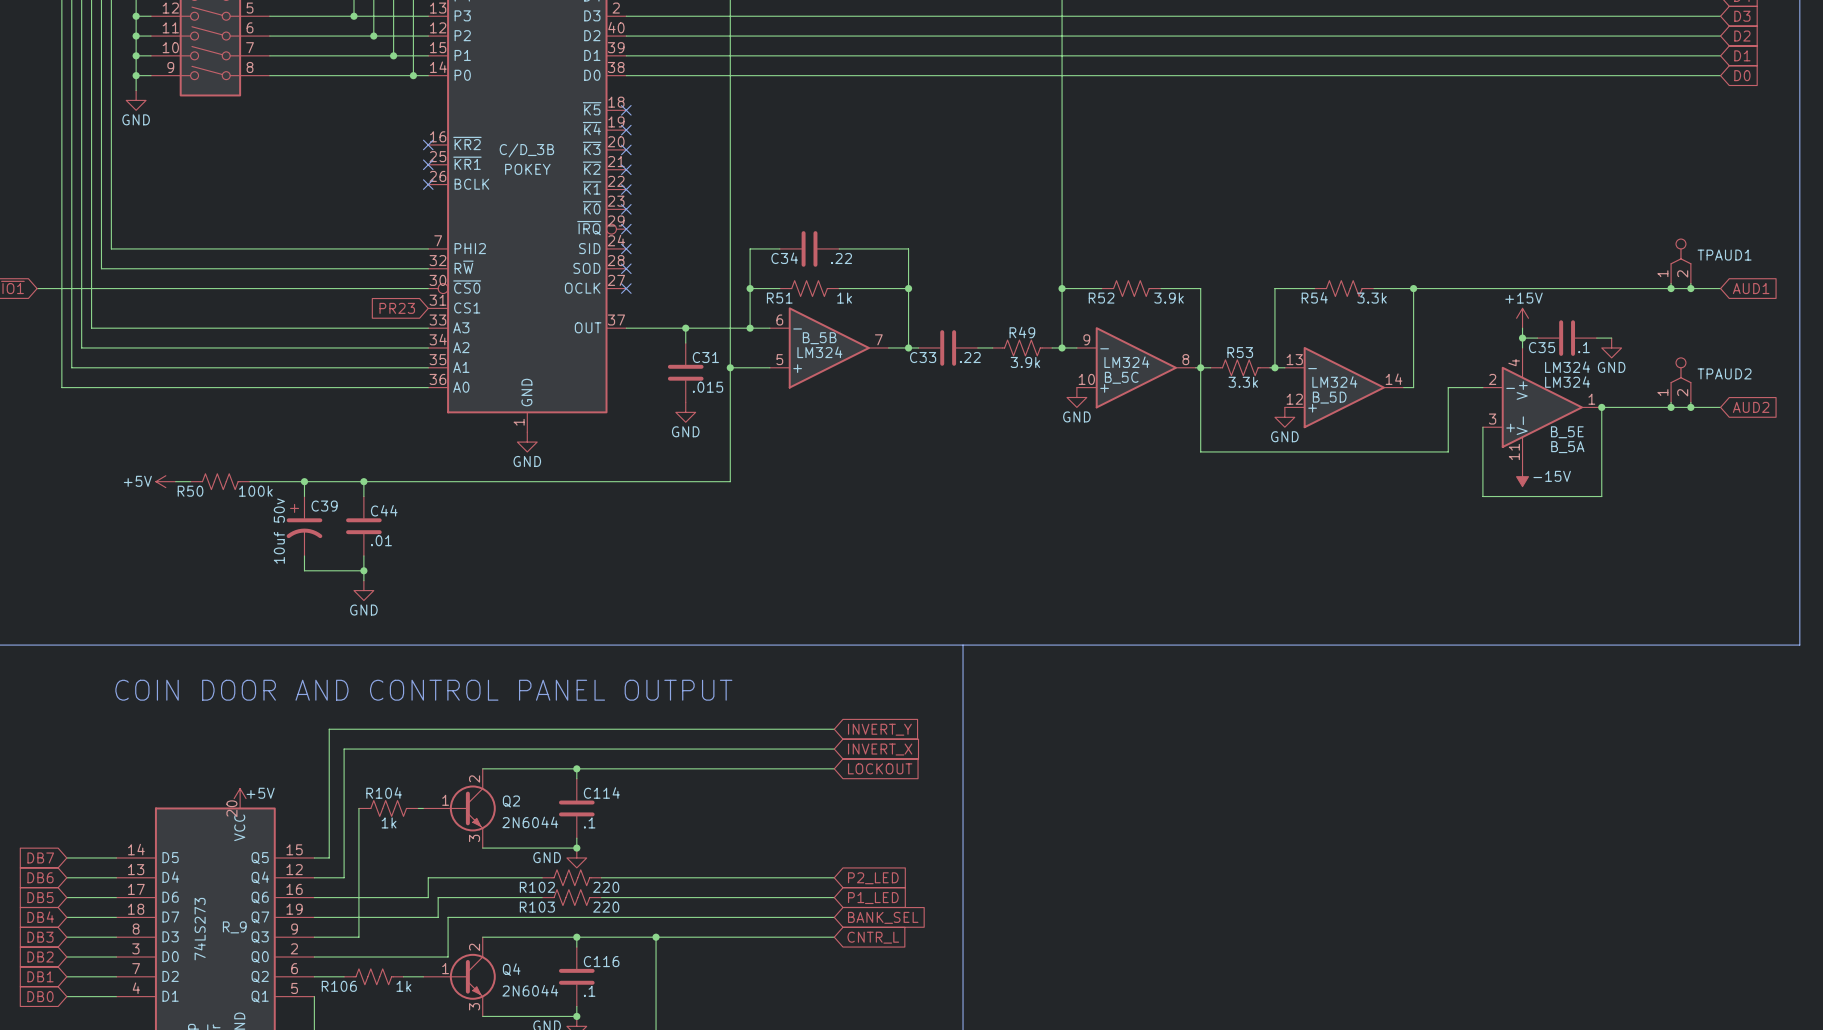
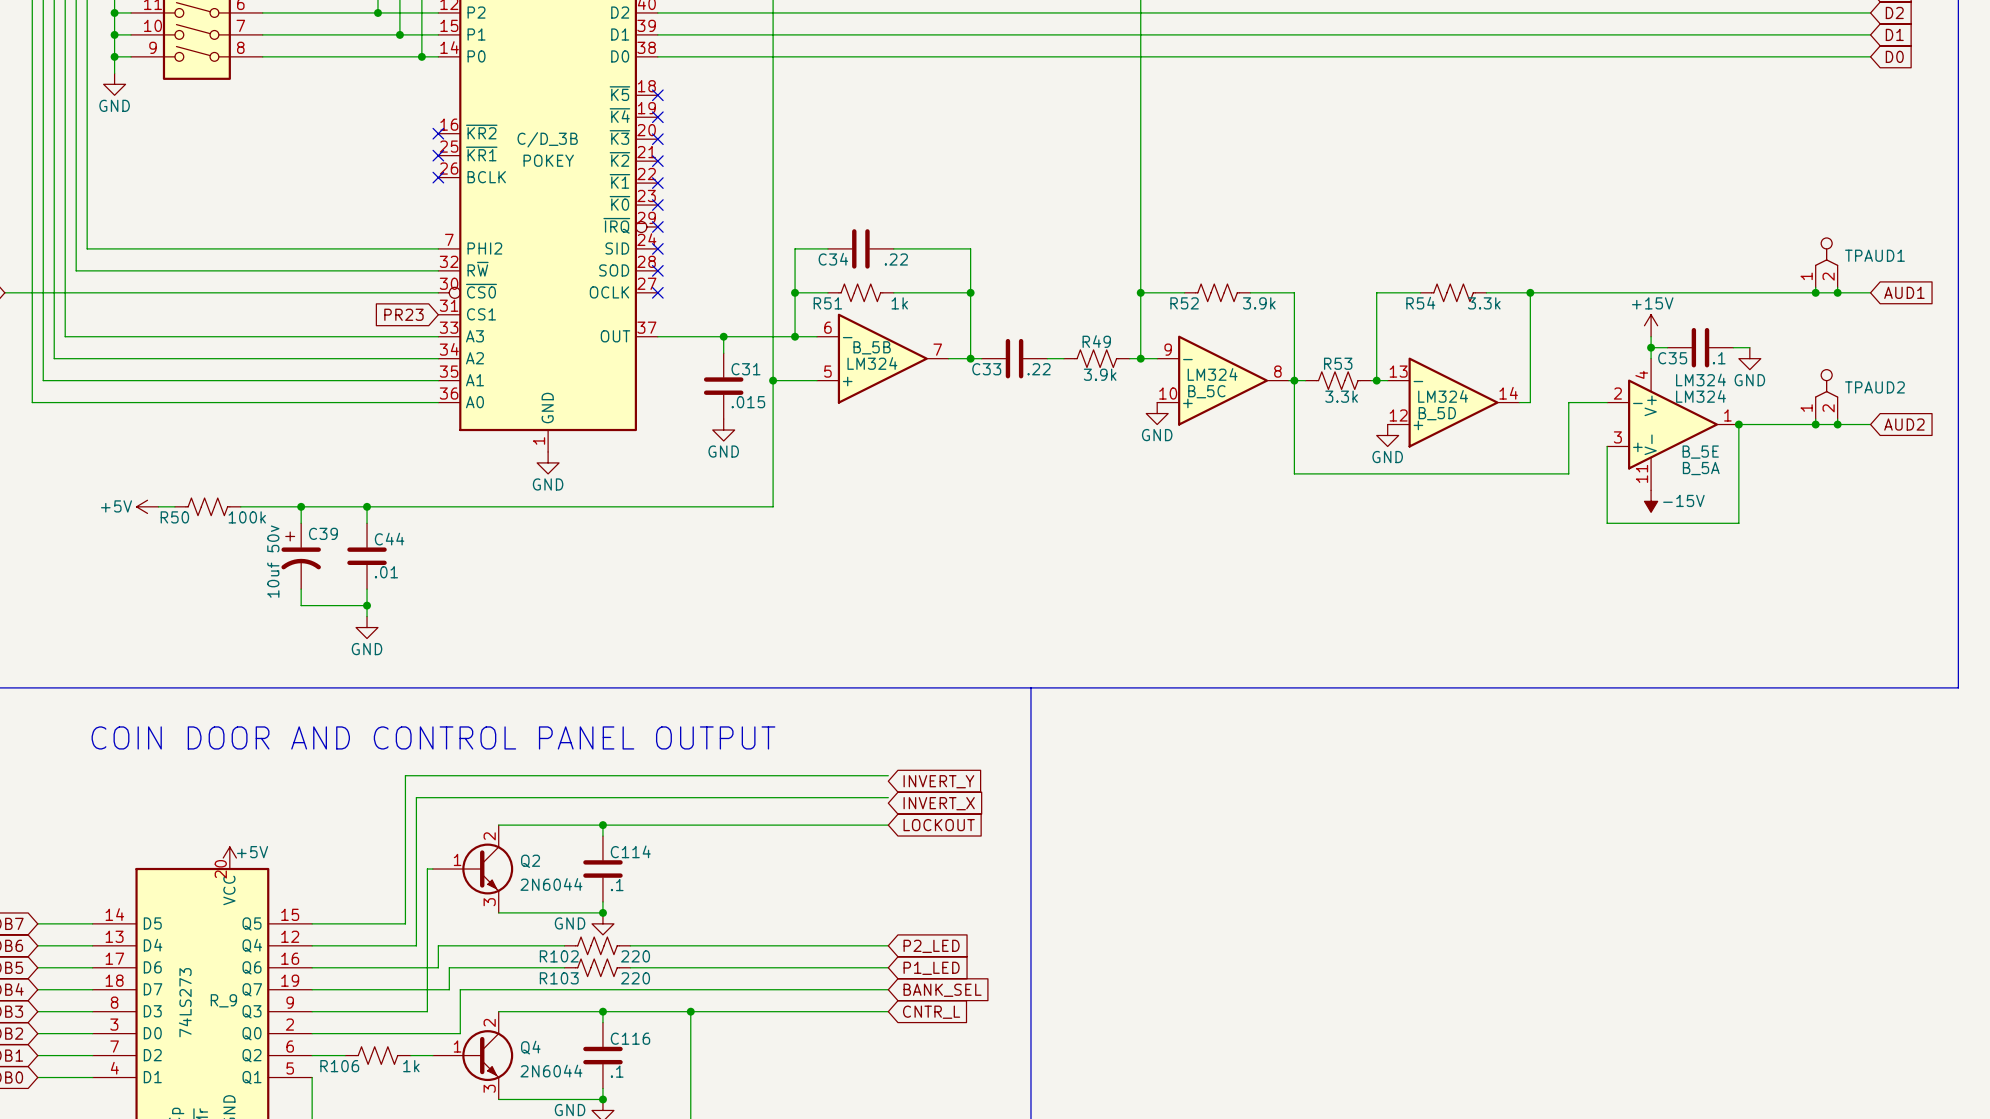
wire: (834, 729) (329, 729) (329, 857) -> (888, 775) (405, 775) (405, 923) (328, 923)
wire: (834, 749) (344, 749) (344, 877) -> (888, 797) (416, 797) (416, 945) (345, 945)
wire: (358, 808) (358, 937) -> (427, 869) (427, 1011) (361, 1011)
R104: 1k (388, 808) -> none

